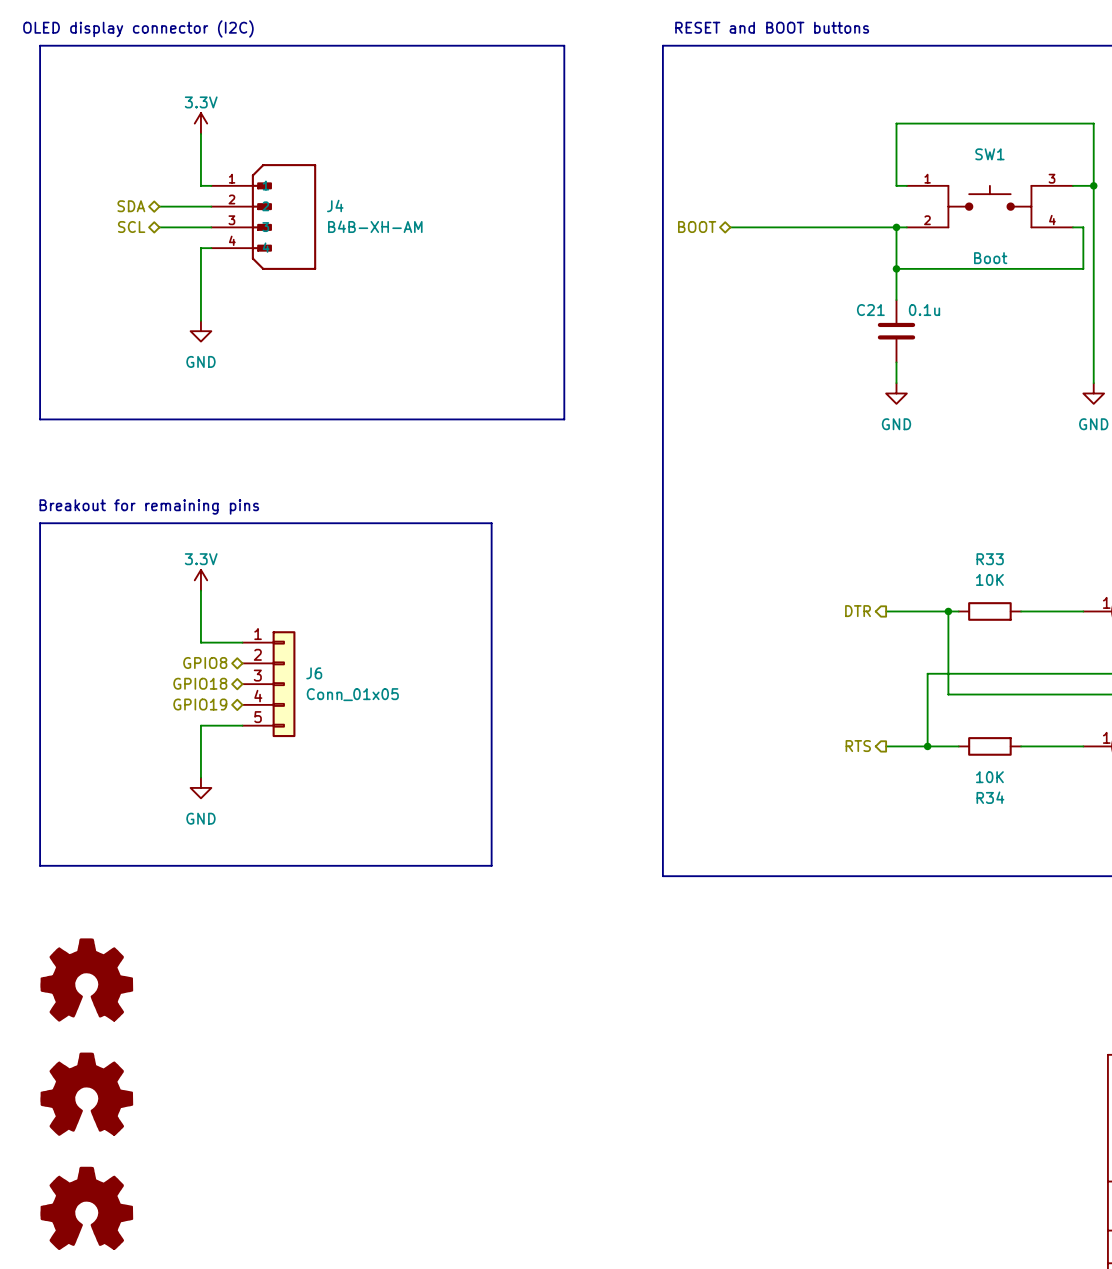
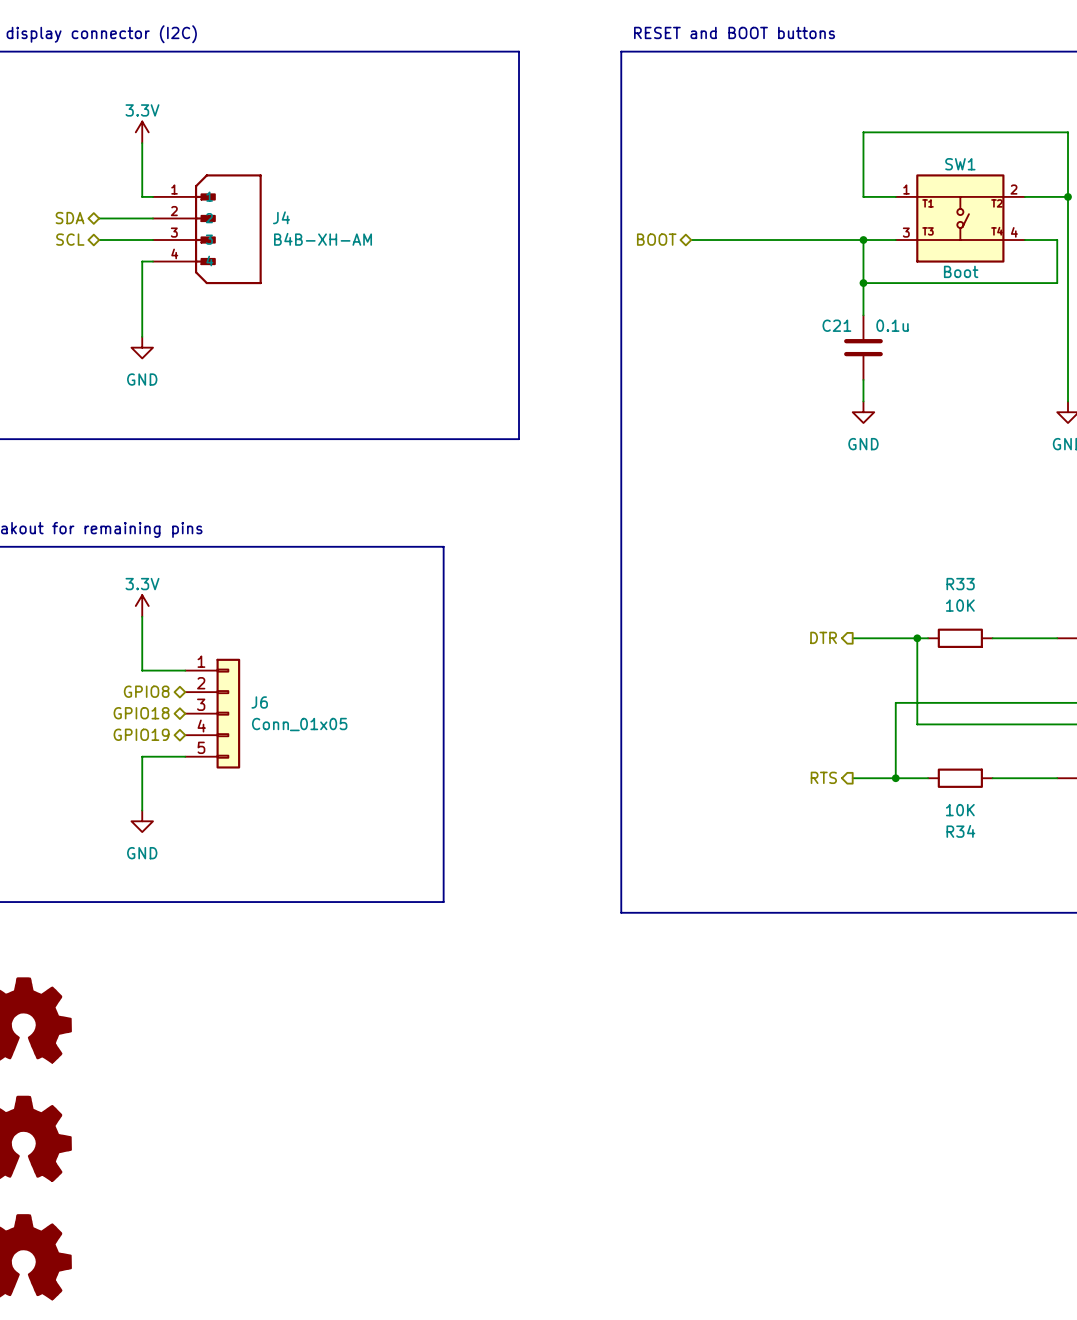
SW1 symbol: [906, 185, 1073, 229] -> [895, 174, 1025, 263]

